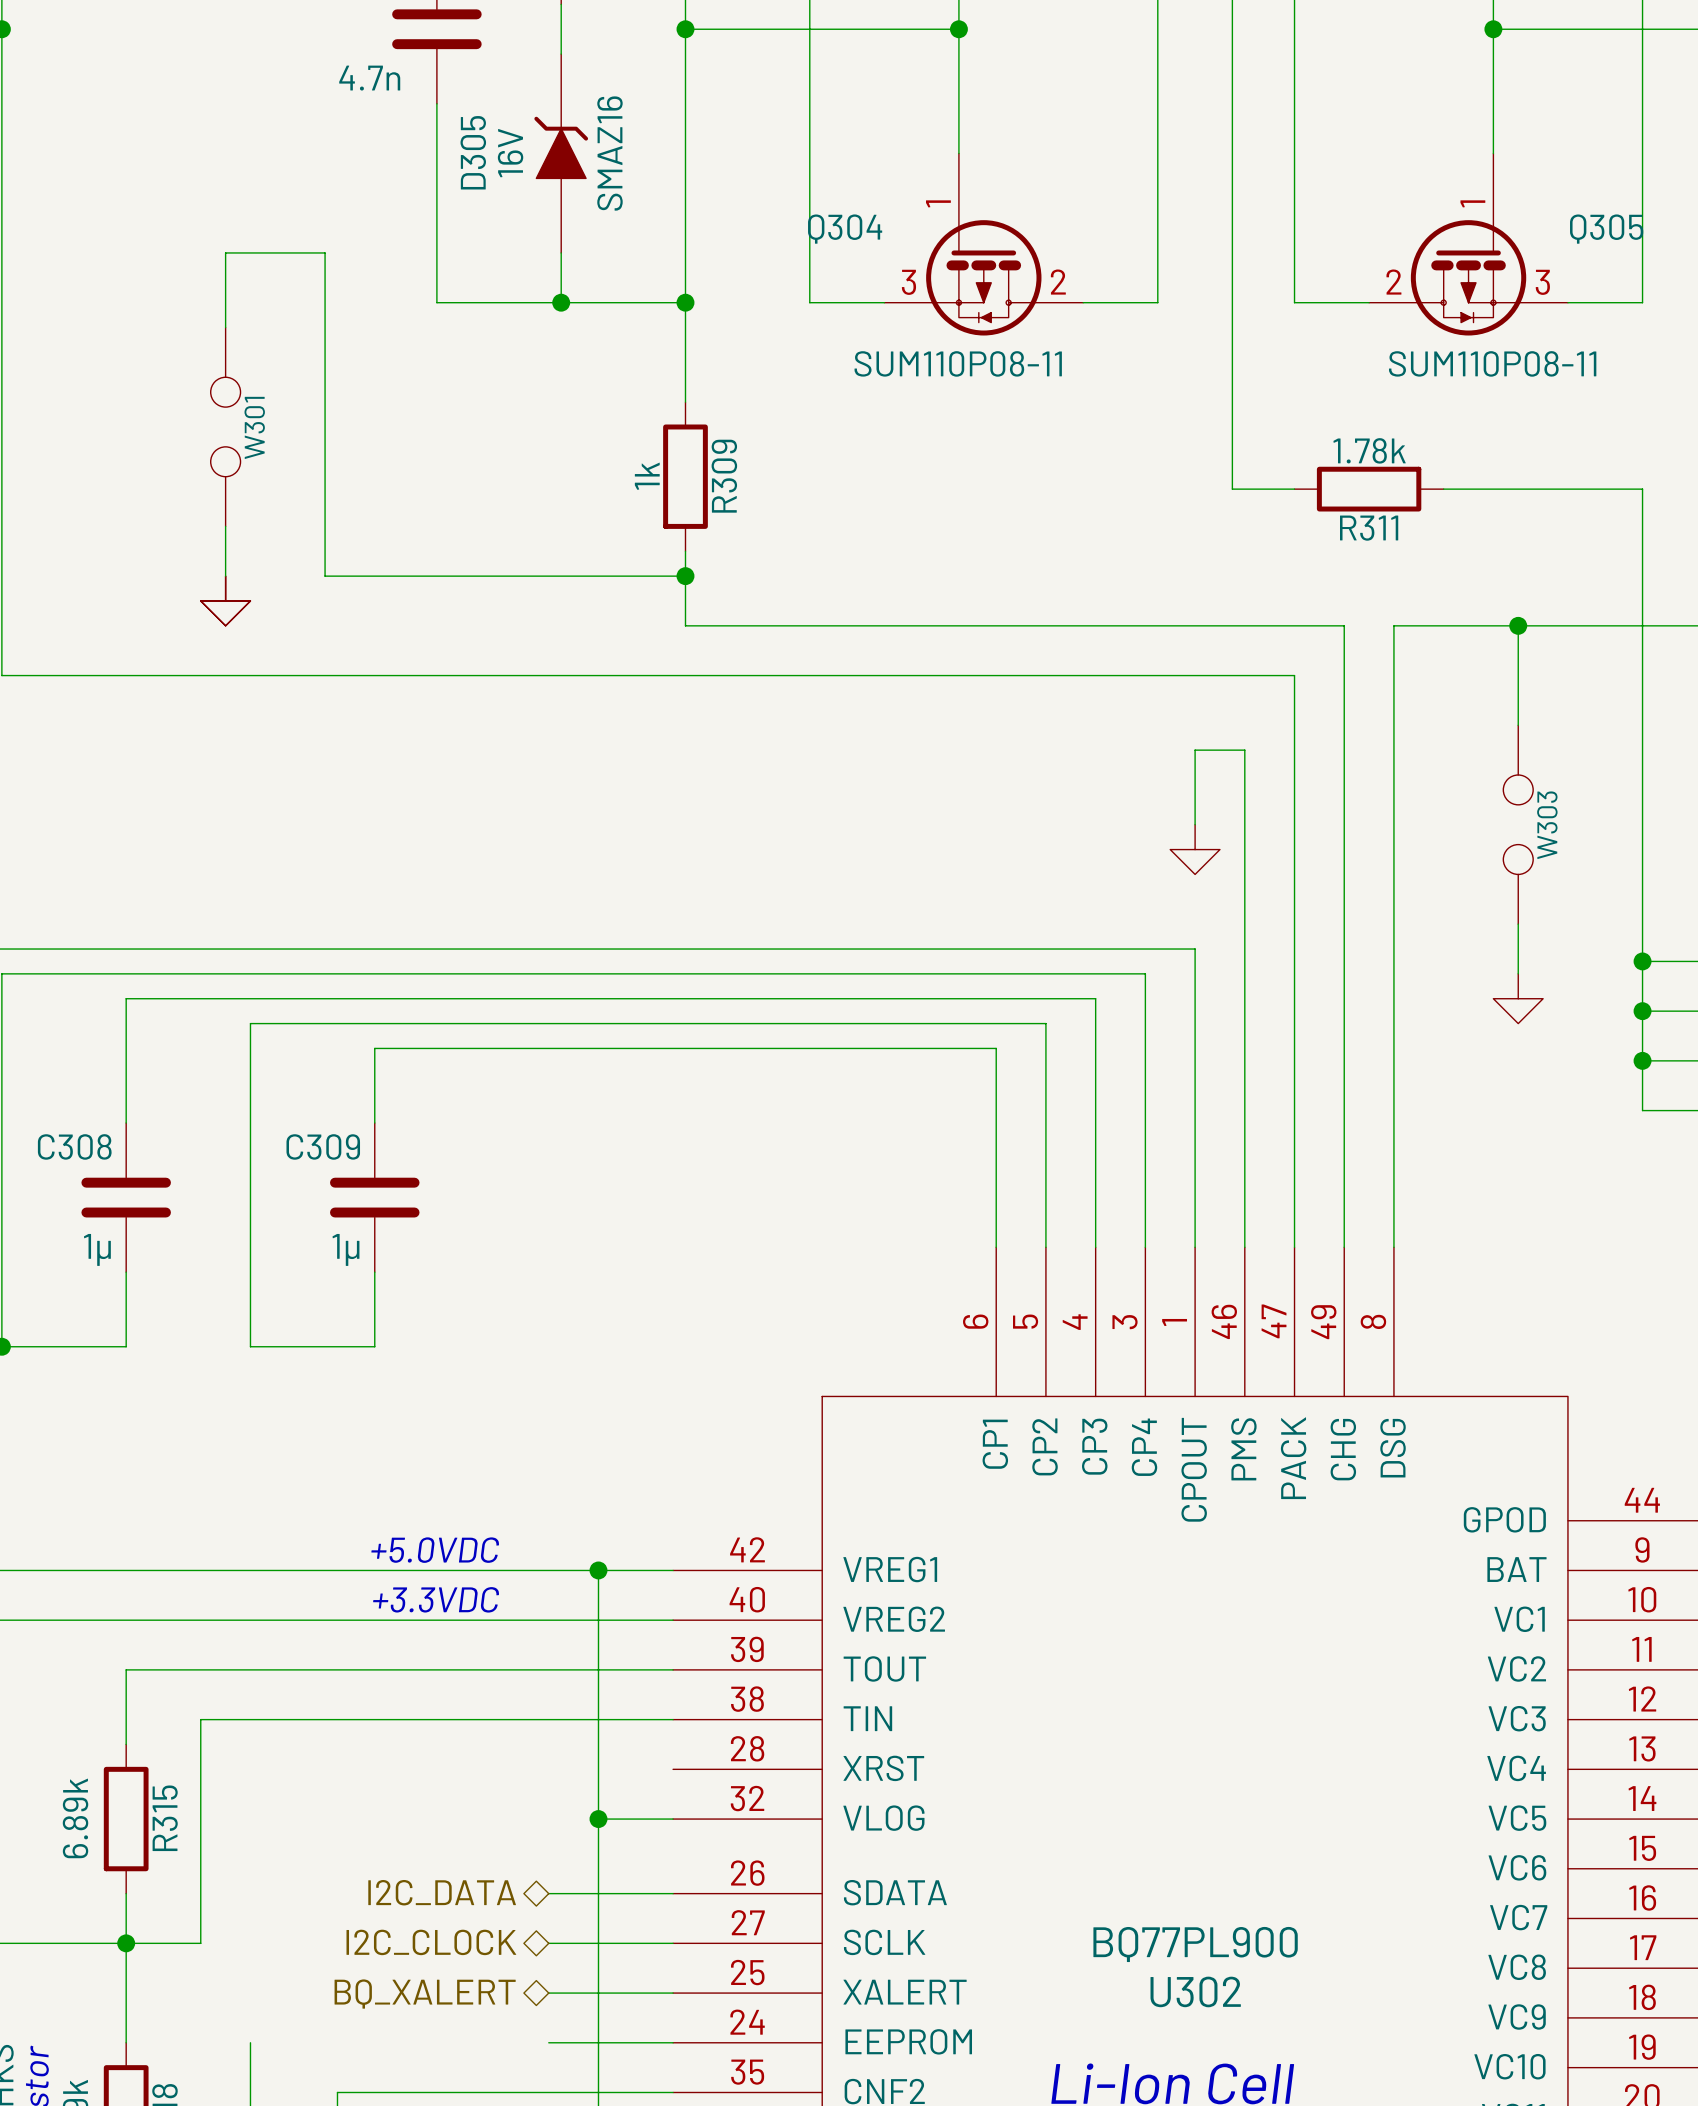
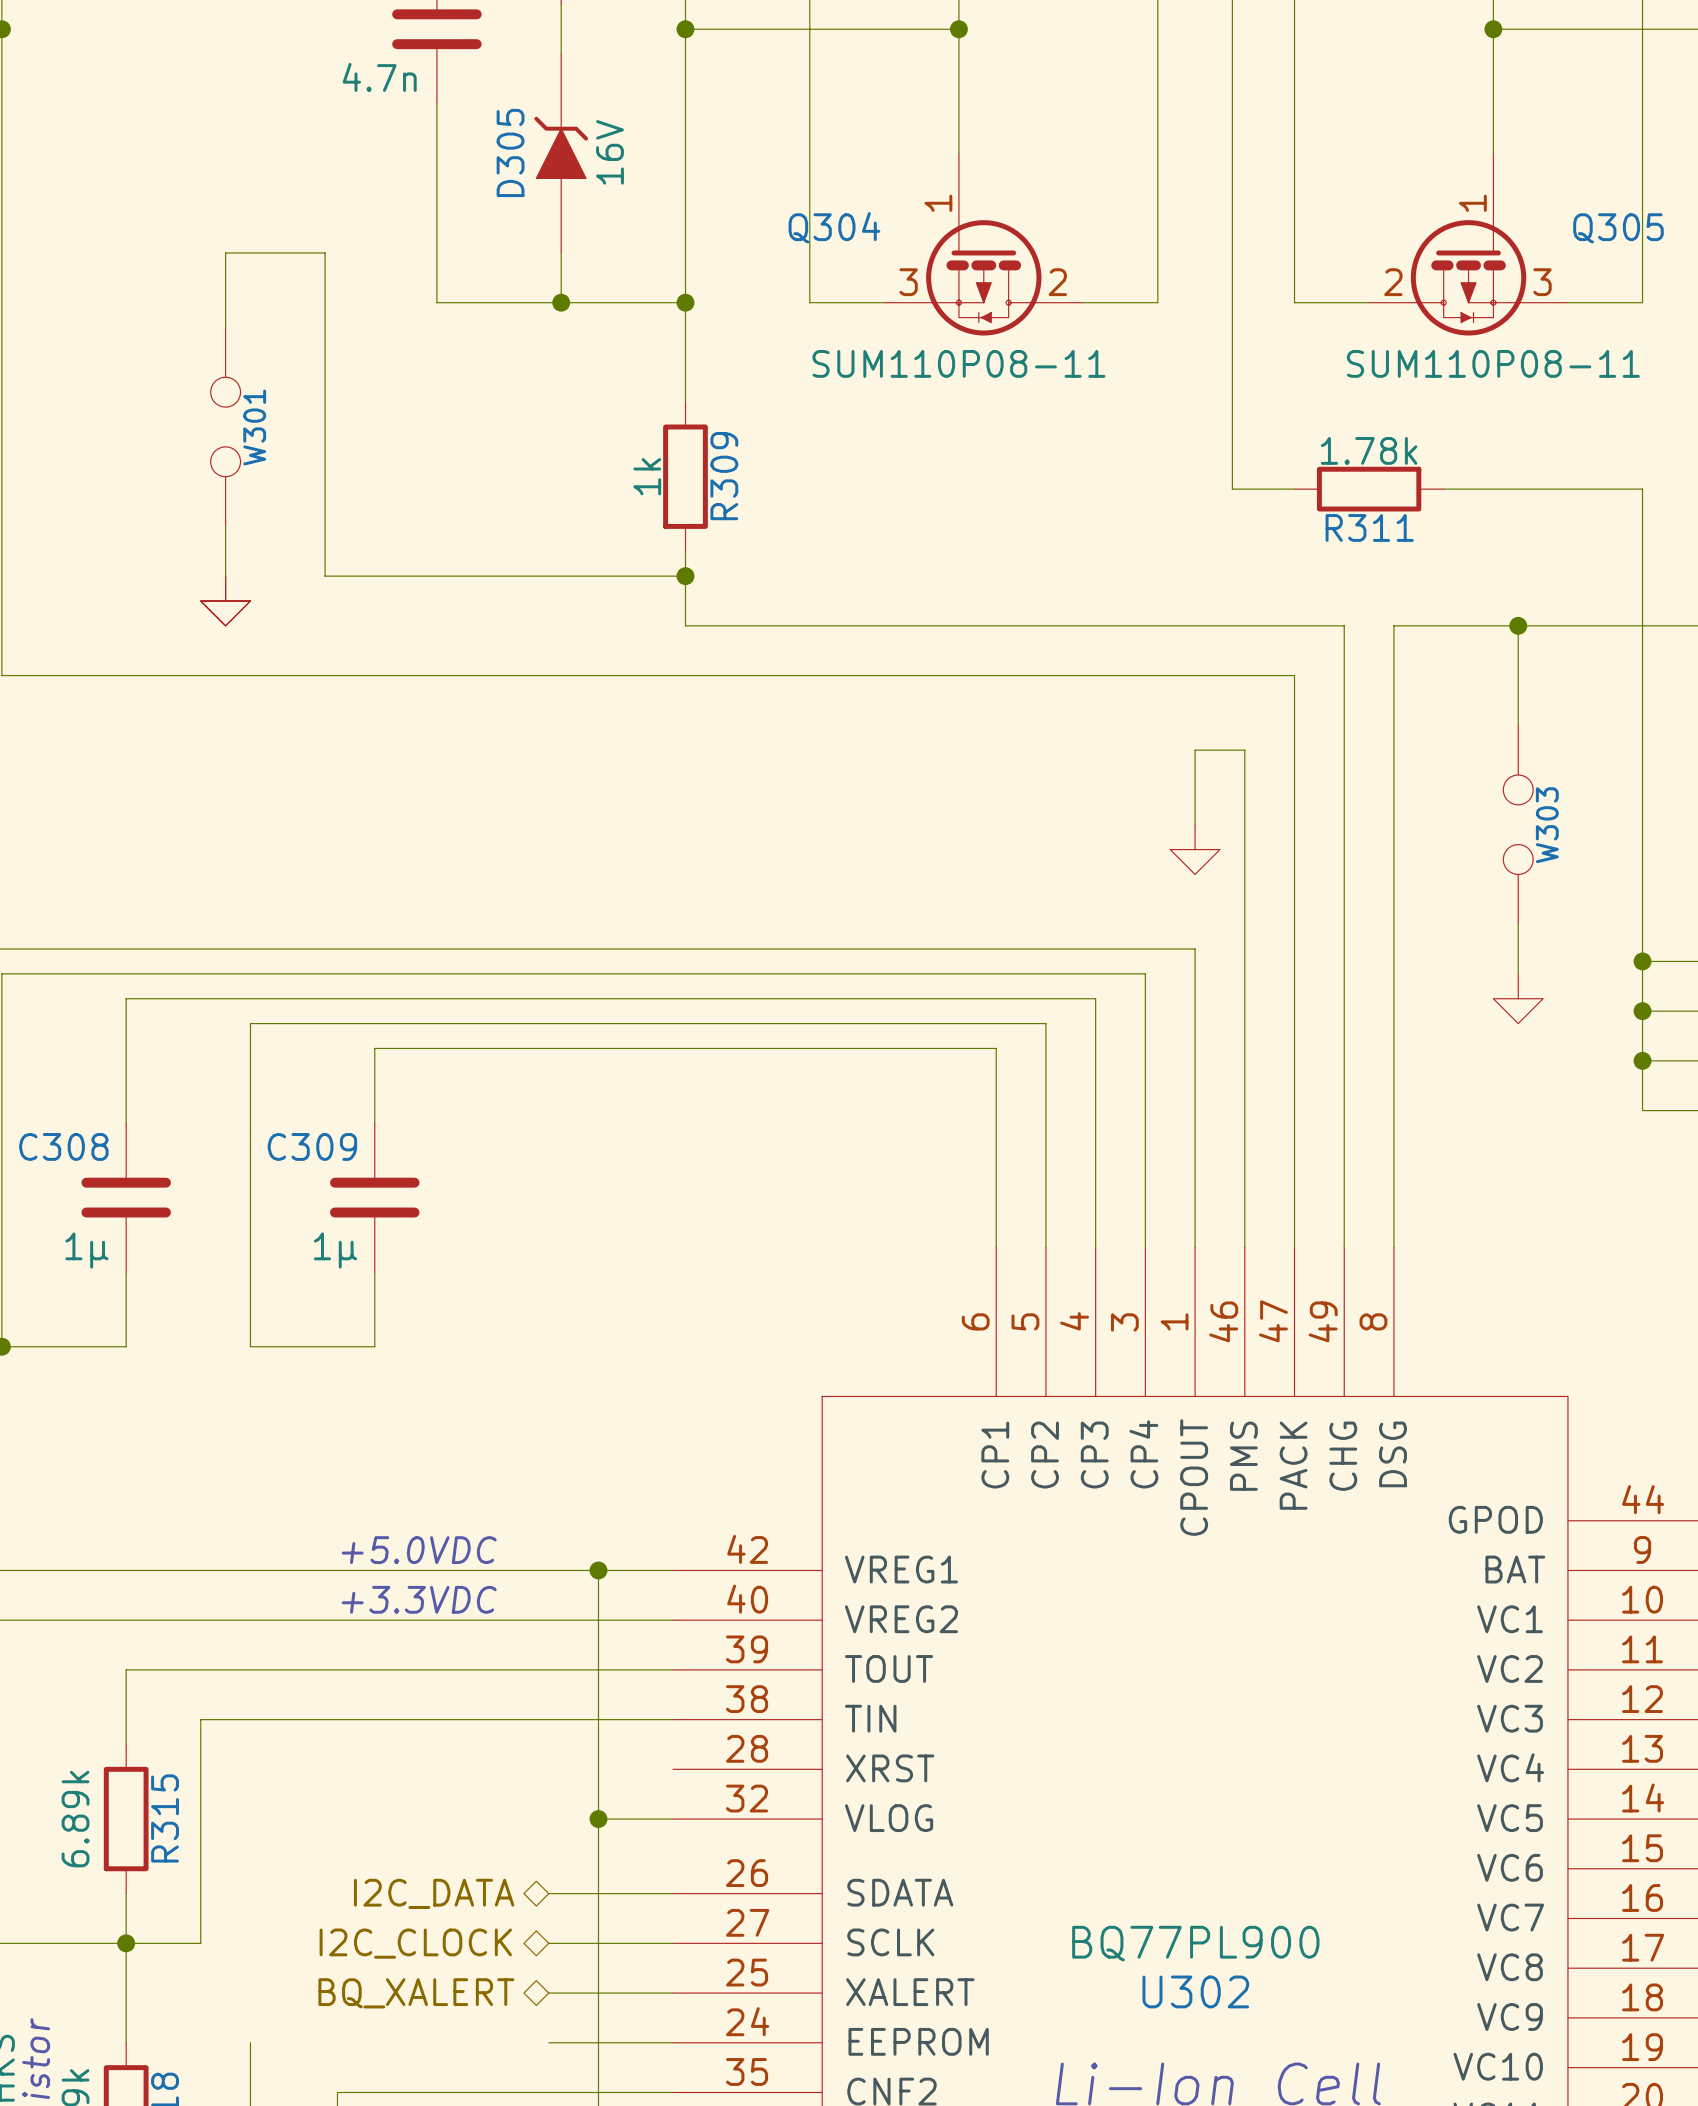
D305 name position: D305 (473, 152) -> D305 (510, 152)
D305 text: 16V (510, 153) -> none
D305 value: SMAZ16 (609, 153) -> 16V (609, 152)

